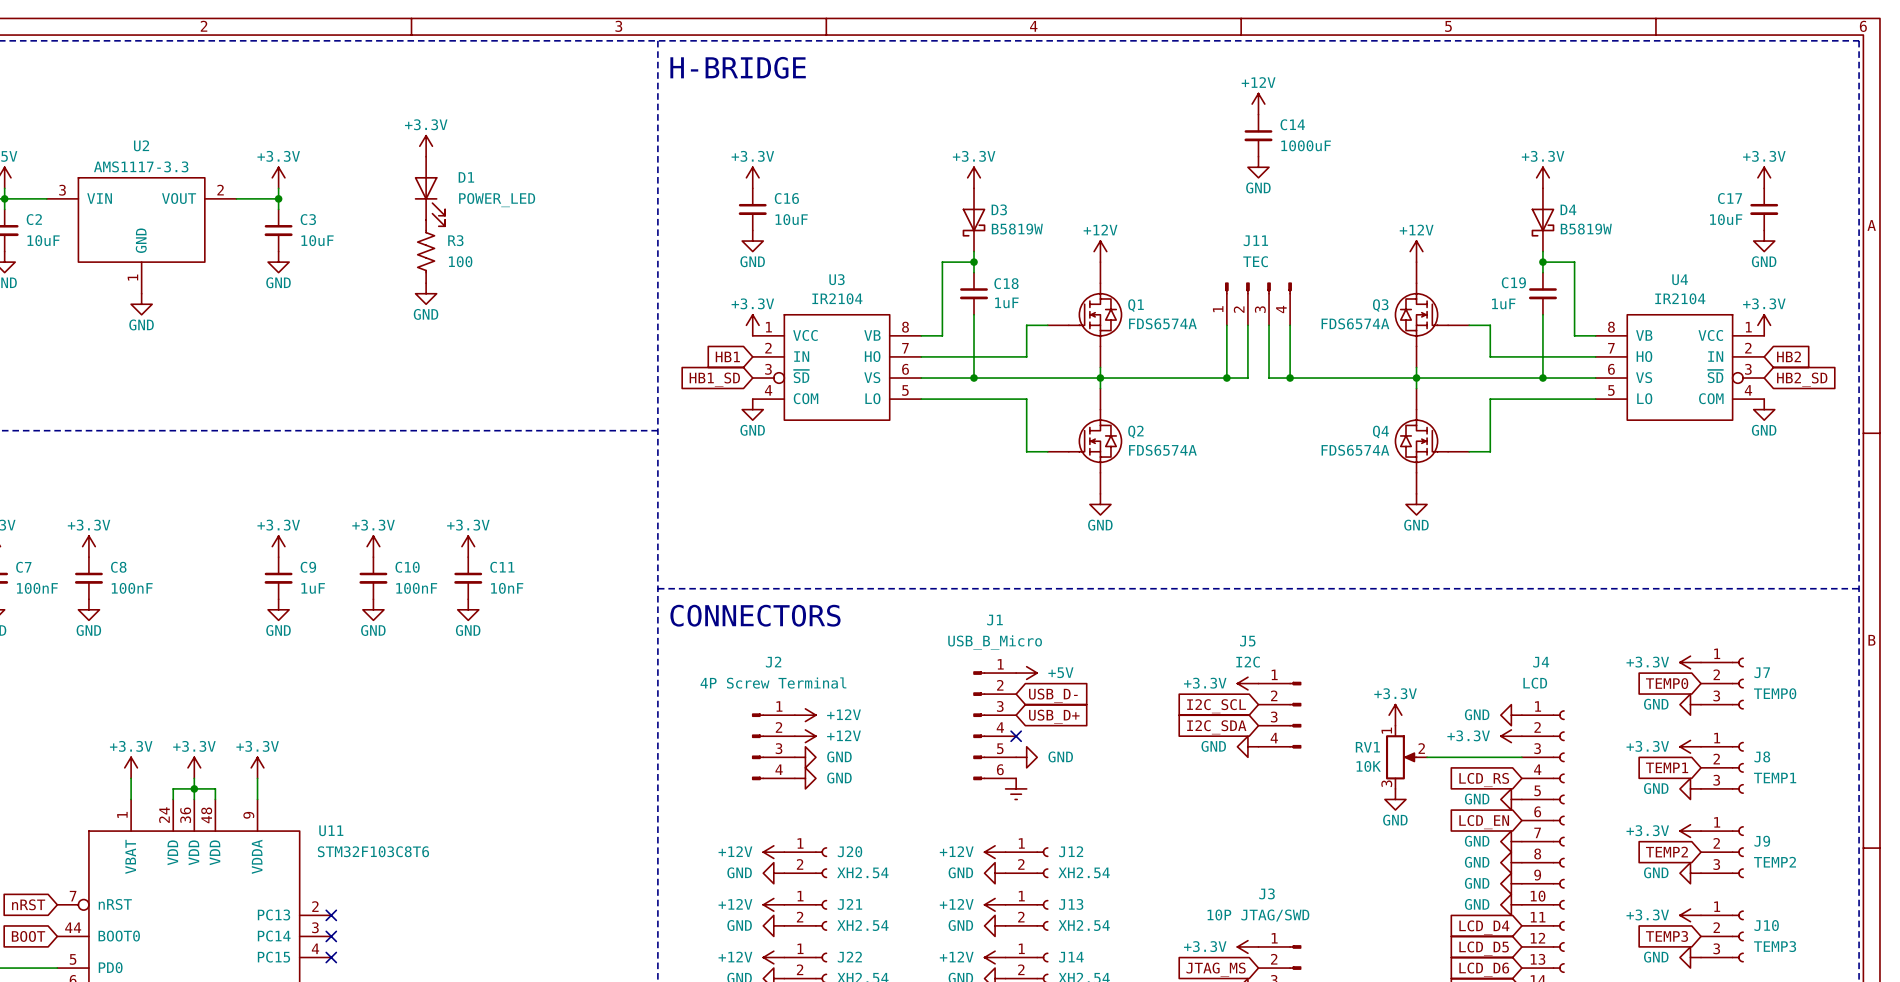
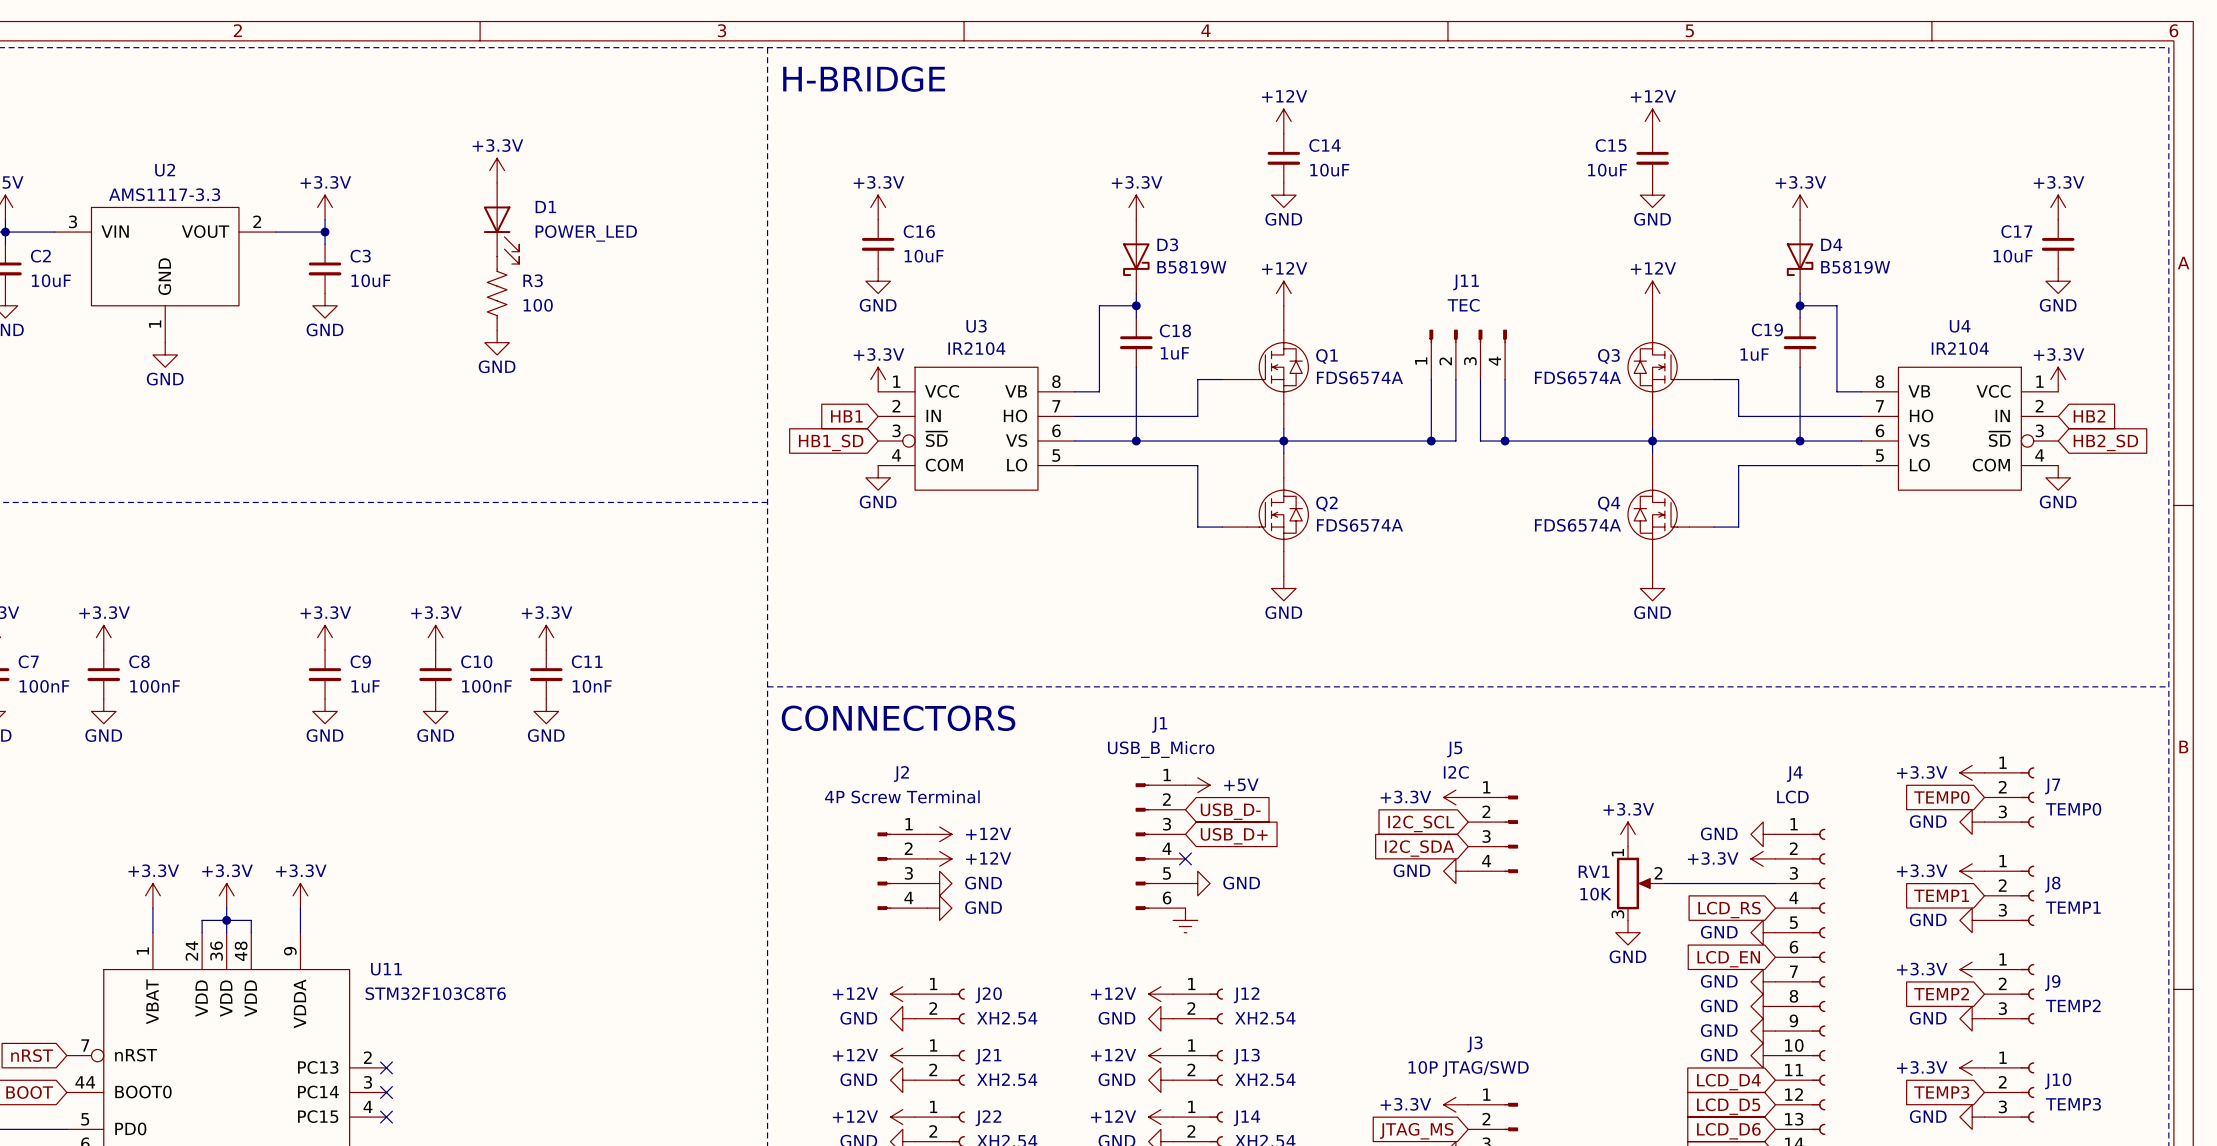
power symbol: none -> +12V (1283, 121)
power symbol: +12V (1258, 104) -> none
power symbol: none -> +12V (1652, 121)
C14 position: (1258, 135) -> (1283, 158)
C15: none -> 10uF (1652, 158)
C14 value: 1000uF (1306, 145) -> 10uF (1329, 170)
power symbol: none -> GND (1283, 195)
power symbol: GND (1258, 167) -> none
power symbol: none -> GND (1652, 195)

